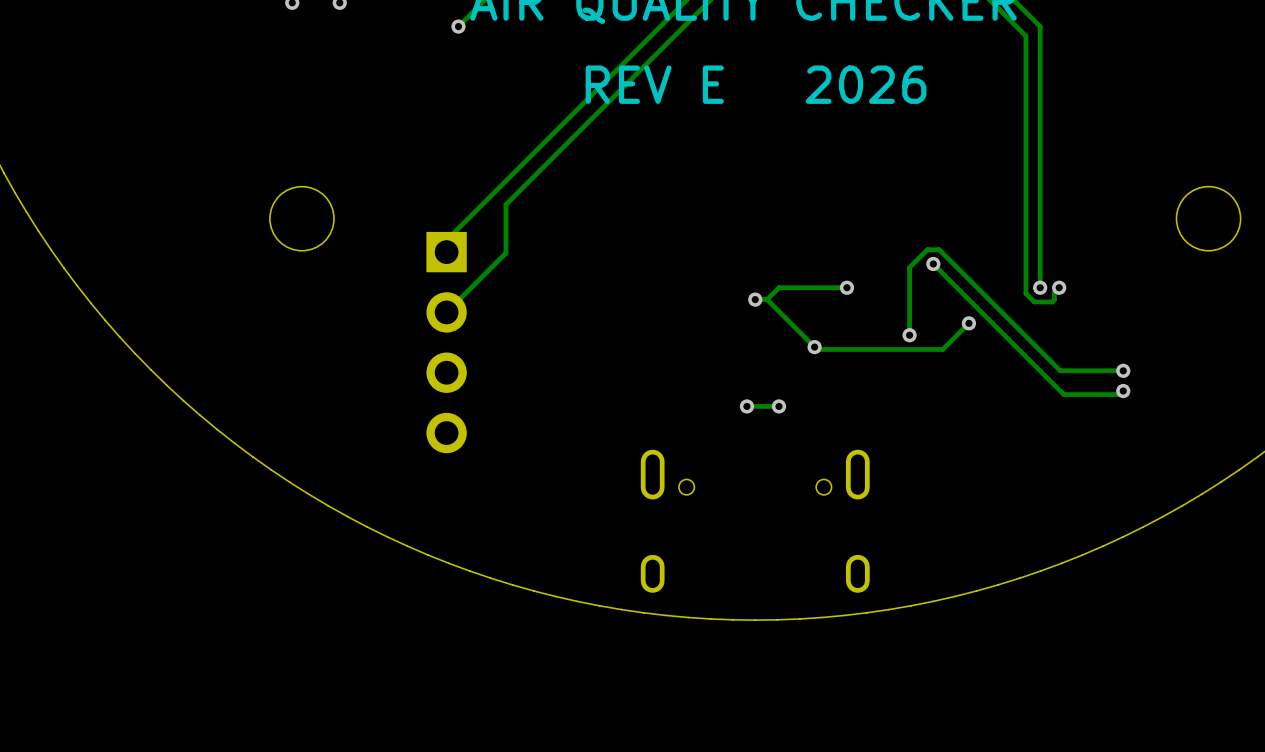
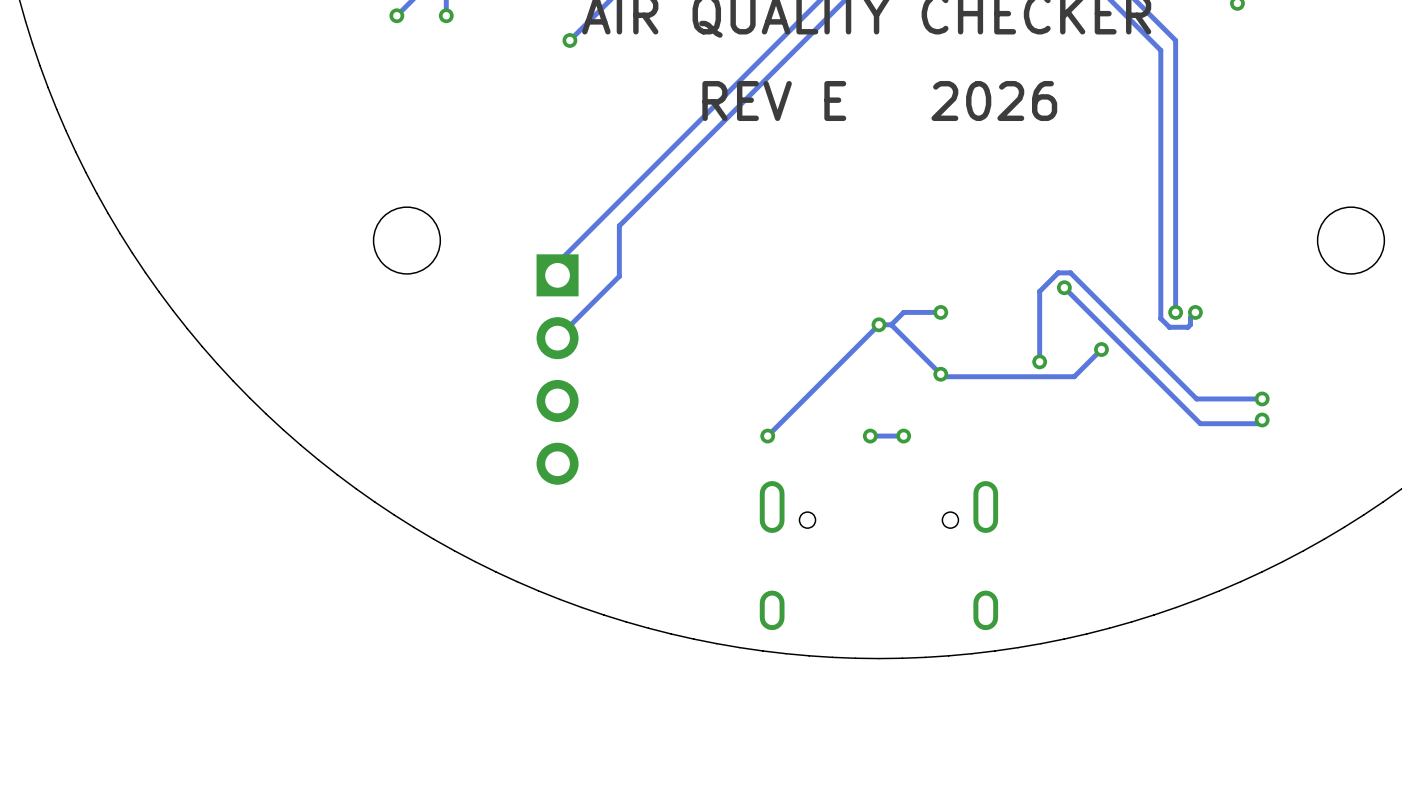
track: (846, 287) (814, 287) -> none
via position: (846, 287) -> (940, 312)
track: none -> (878, 324) (767, 436)
via: none -> (767, 436)

